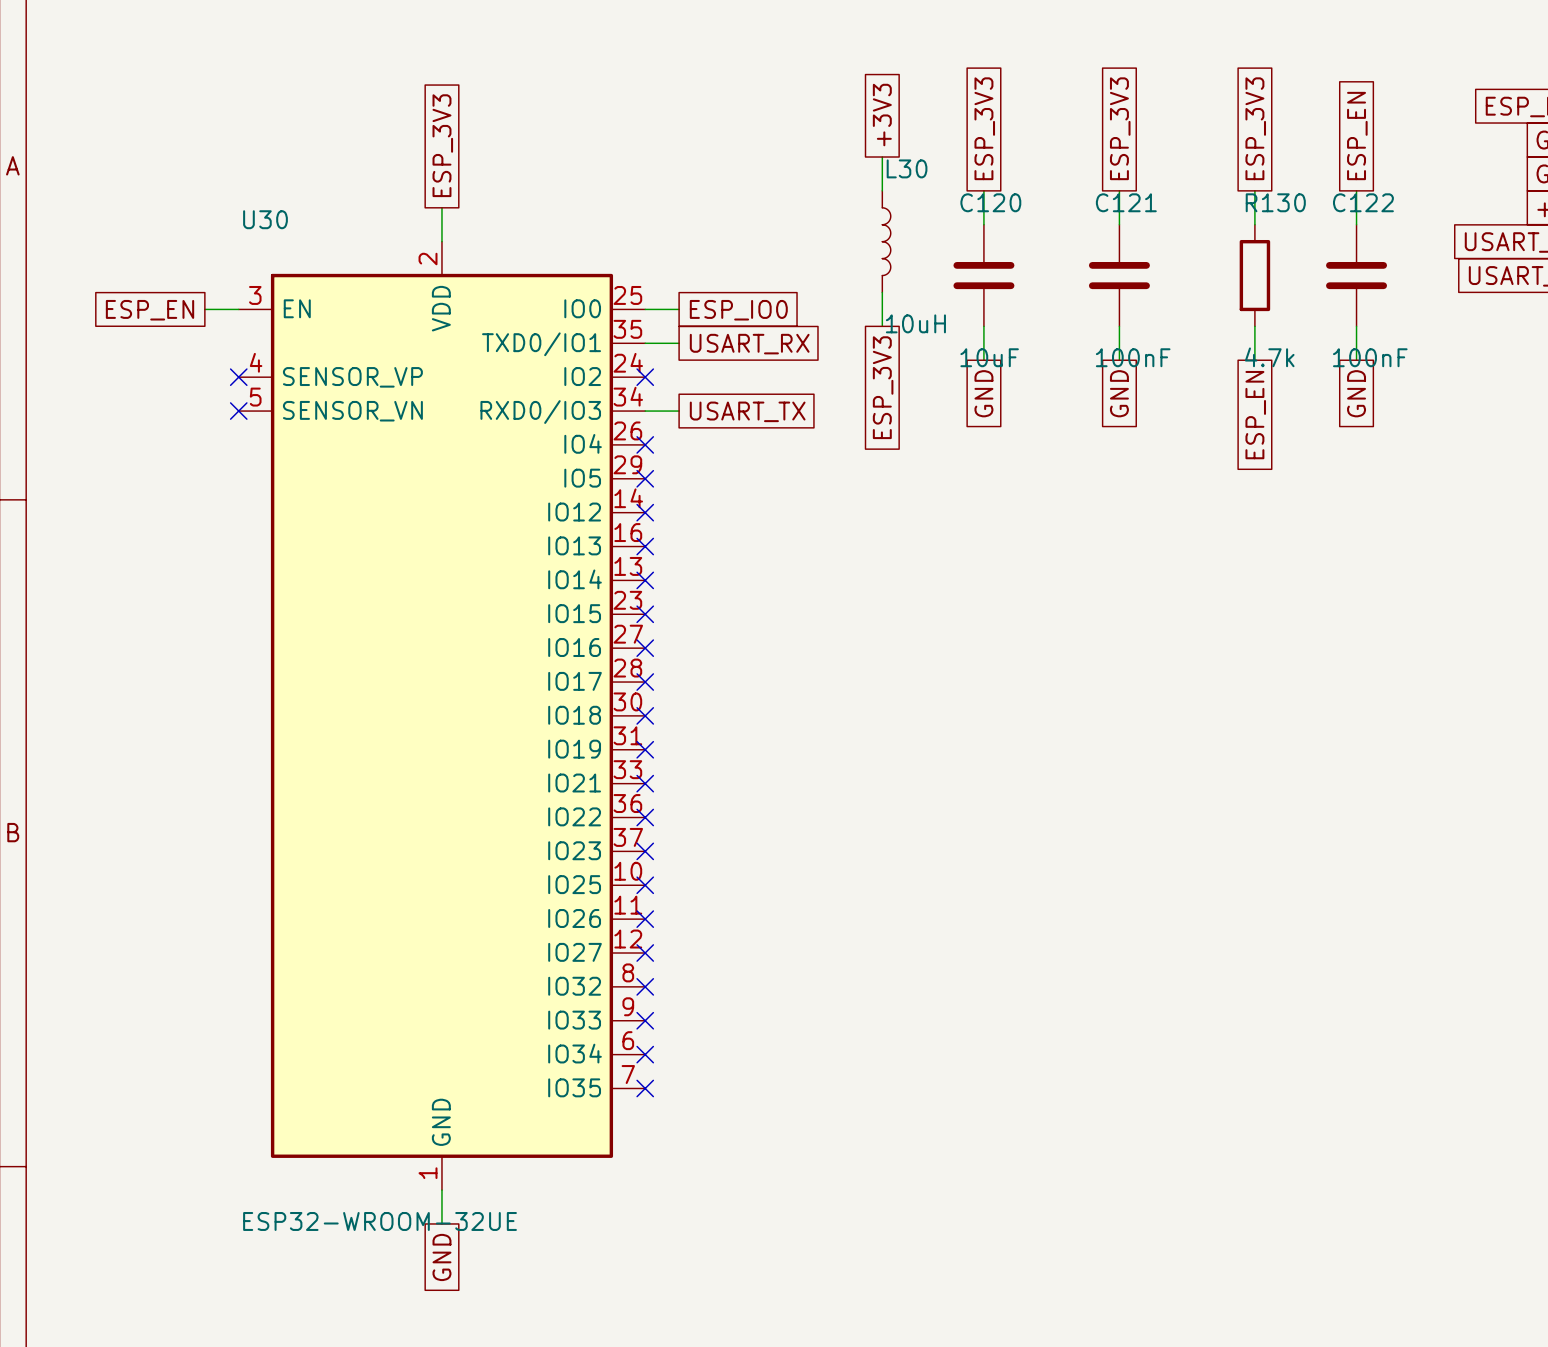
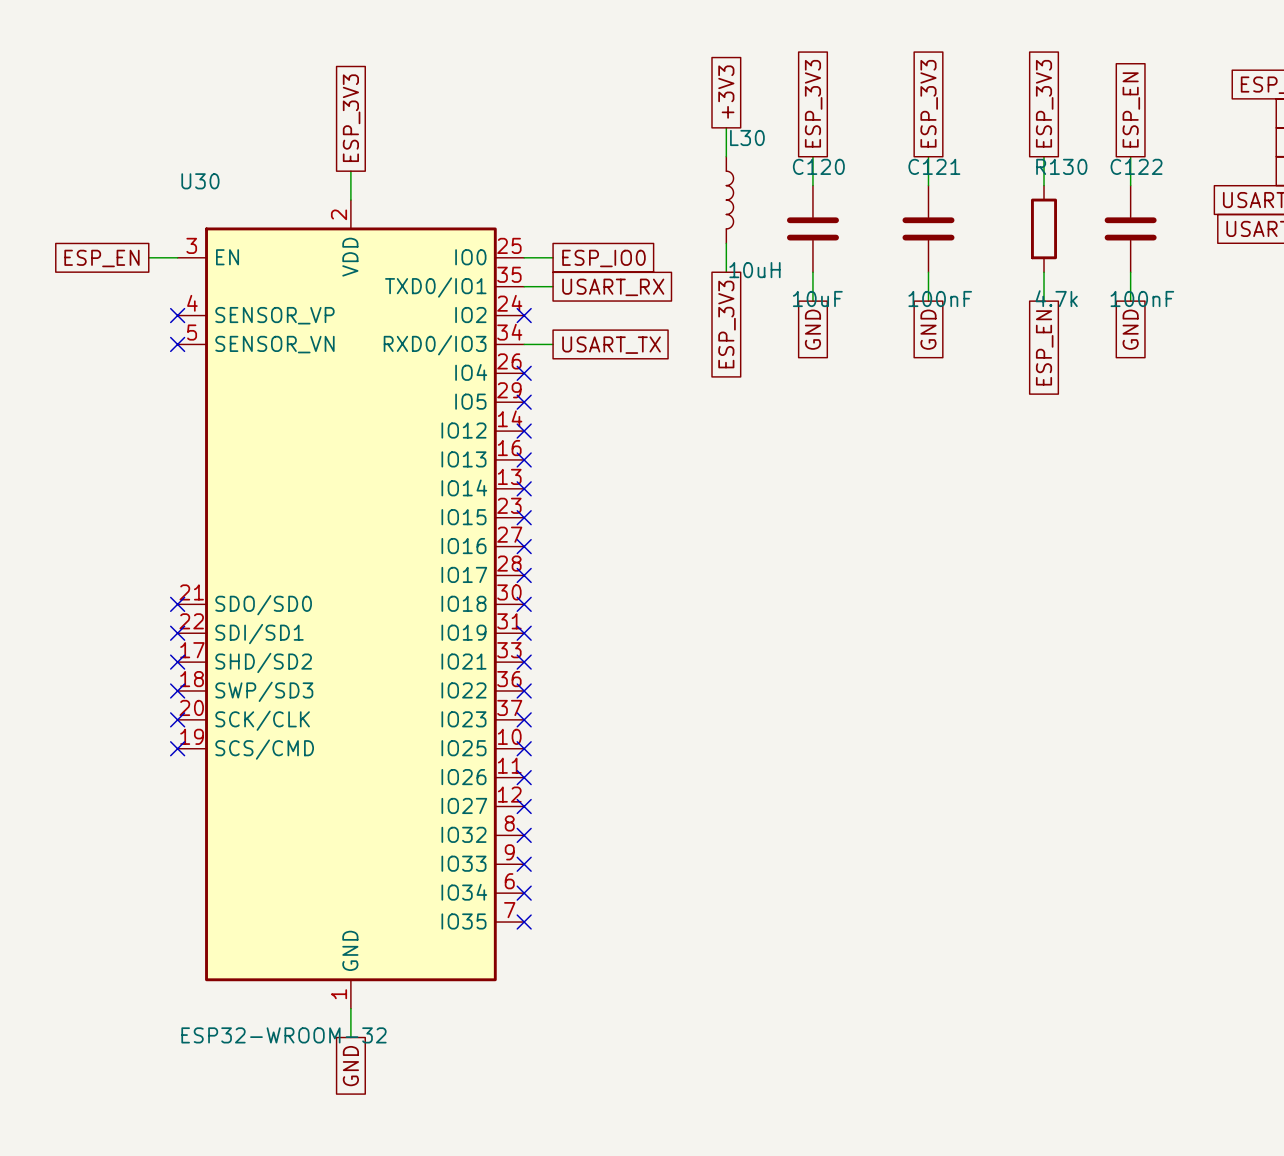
U30 symbol: [238, 241, 646, 1191] -> [177, 200, 525, 1009]
no-connect mark: none -> (177, 604)
no-connect mark: none -> (177, 633)
no-connect mark: none -> (177, 662)
no-connect mark: none -> (177, 690)
no-connect mark: none -> (177, 719)
no-connect mark: none -> (177, 748)
U30 value: ESP32-WROOM-32UE (380, 1221) -> ESP32-WROOM-32 (283, 1035)

